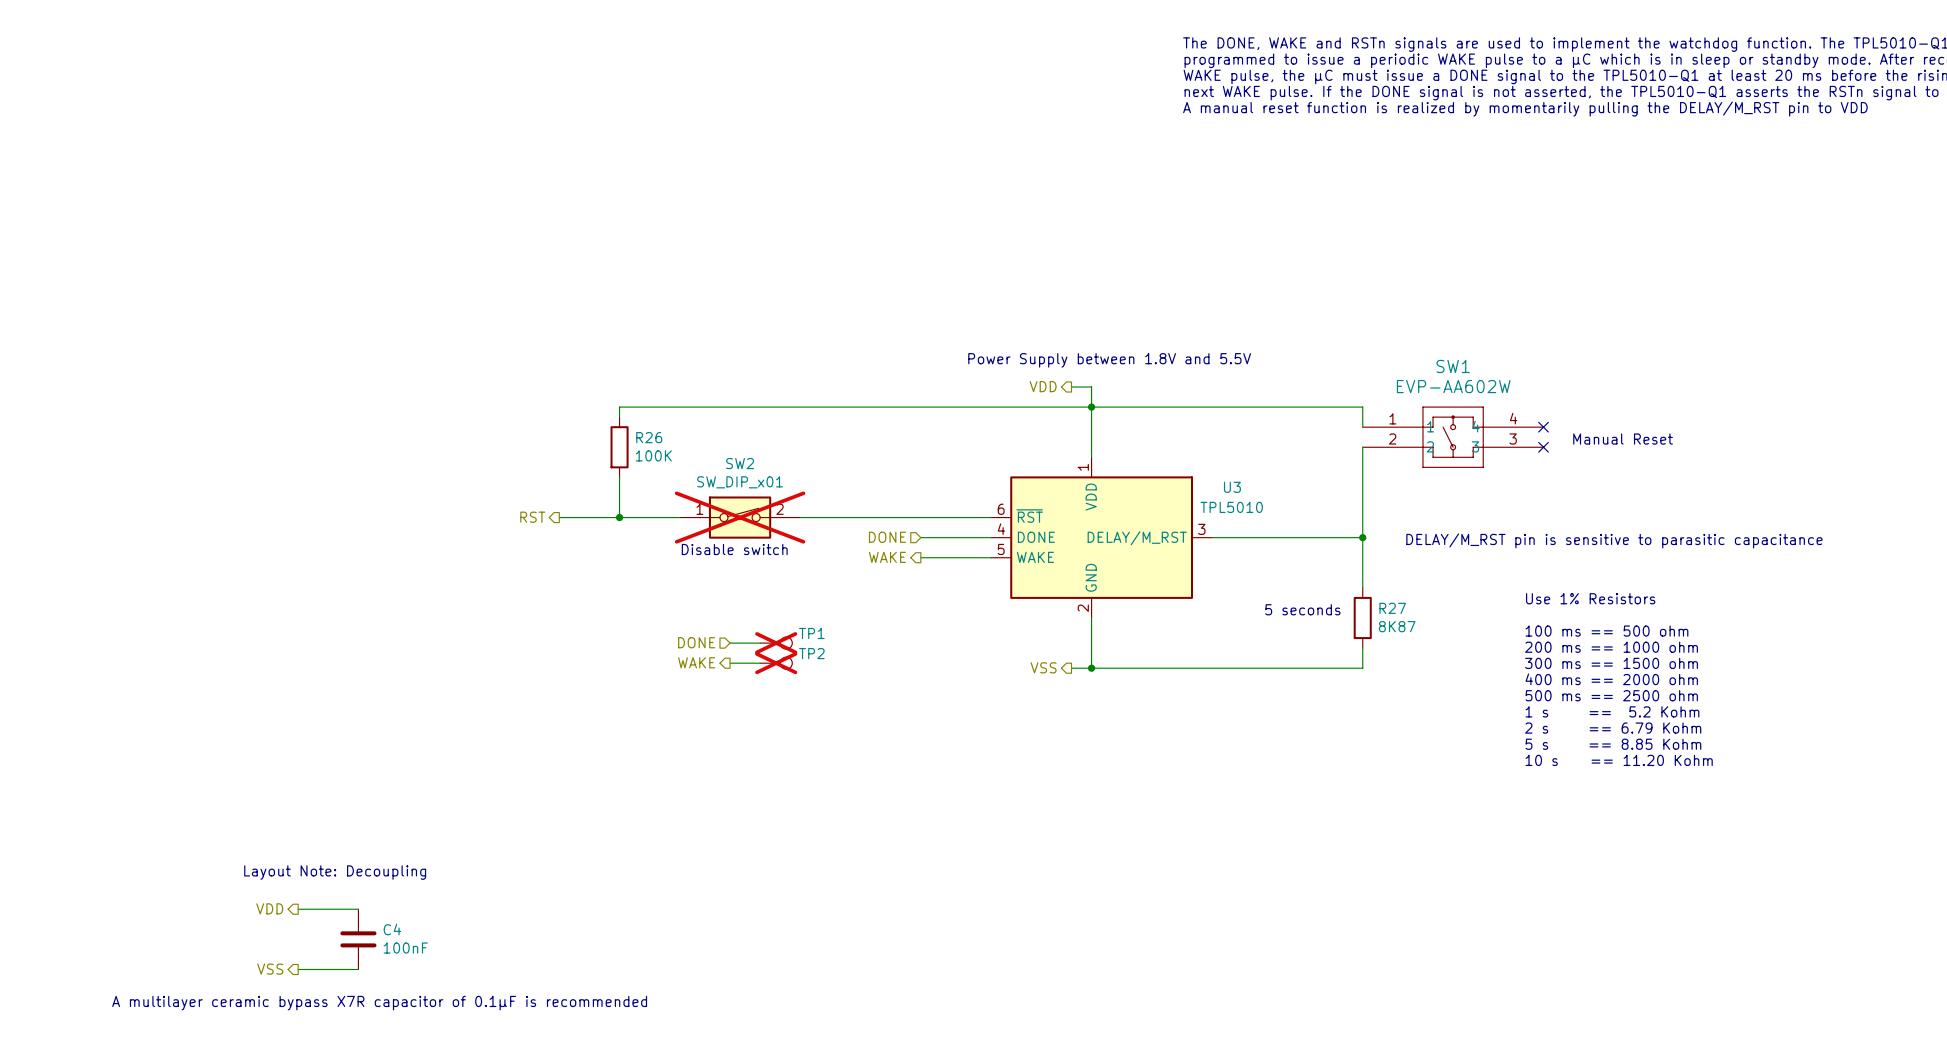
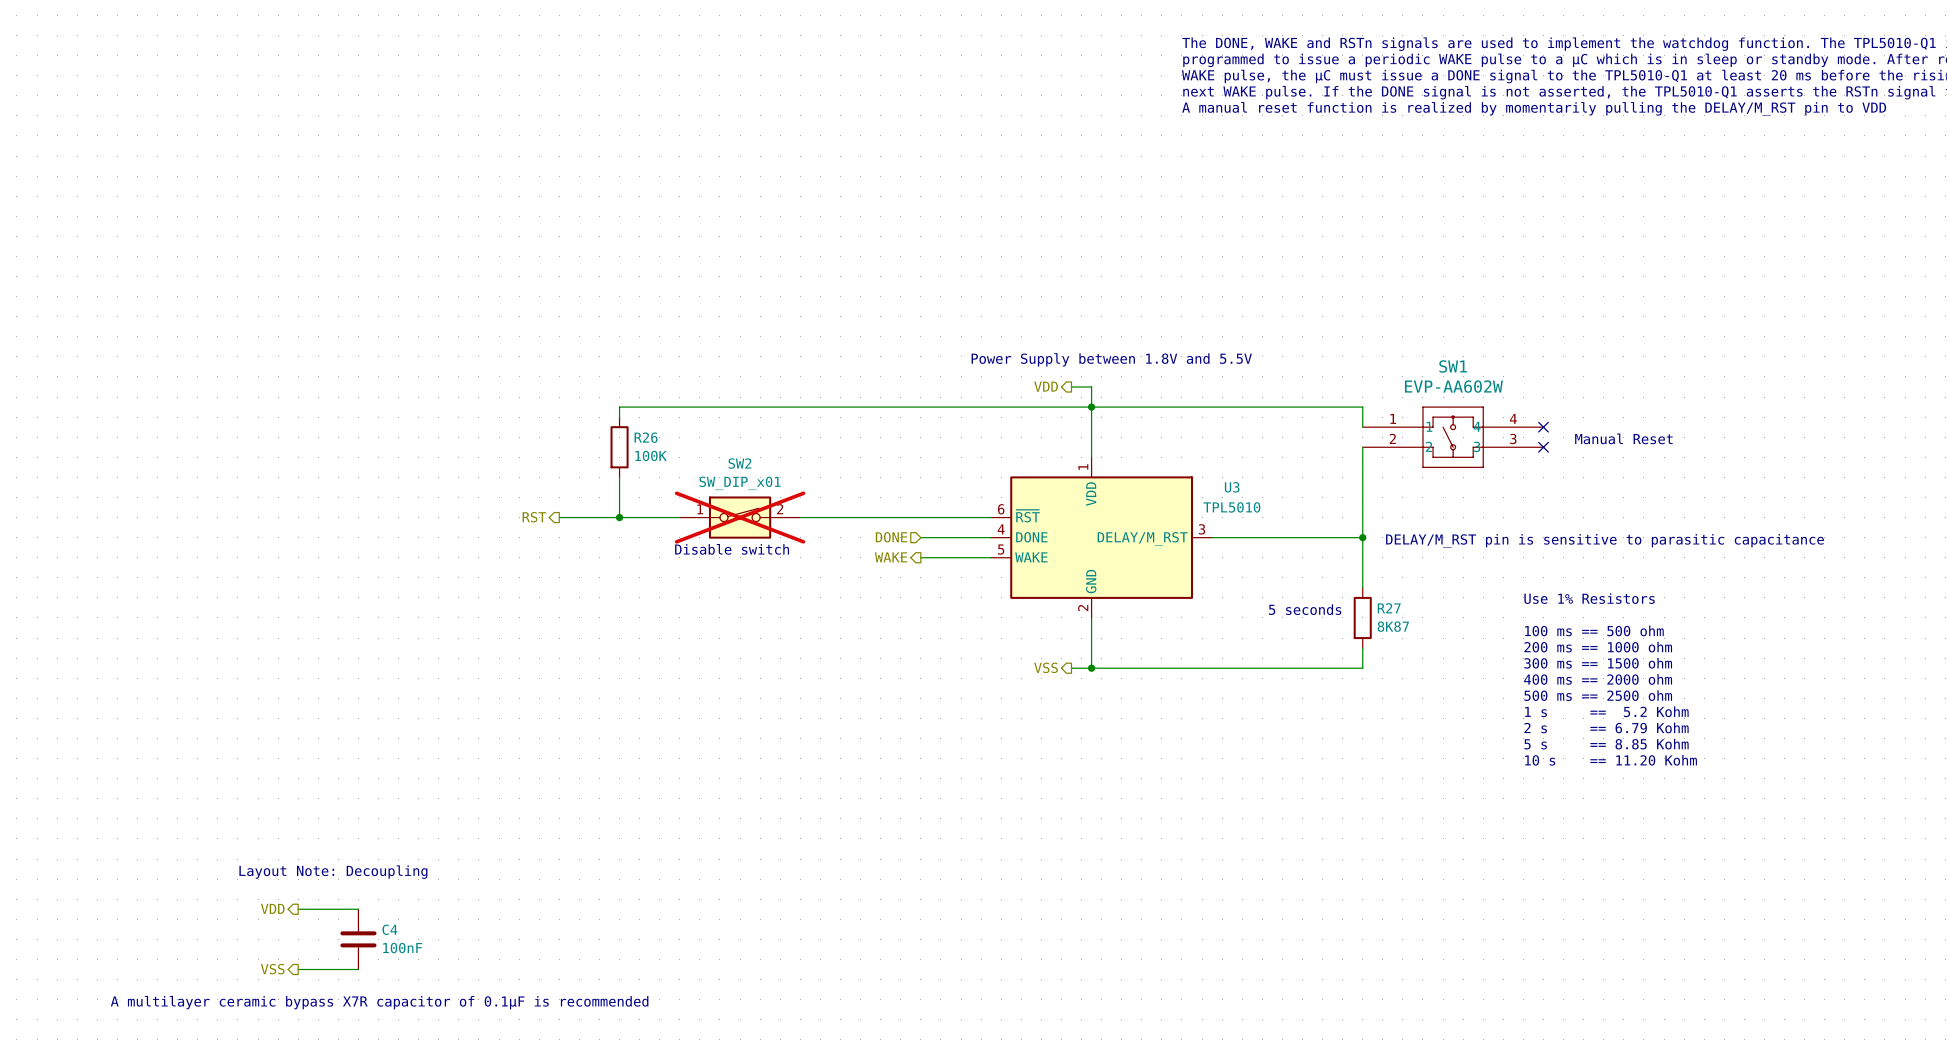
hierarchical label: DONE (696, 642) -> none
wire: (730, 643) (760, 643) -> none
TP1: (776, 643) -> none
hierarchical label: WAKE (696, 662) -> none
wire: (730, 663) (760, 663) -> none
TP2: (776, 663) -> none

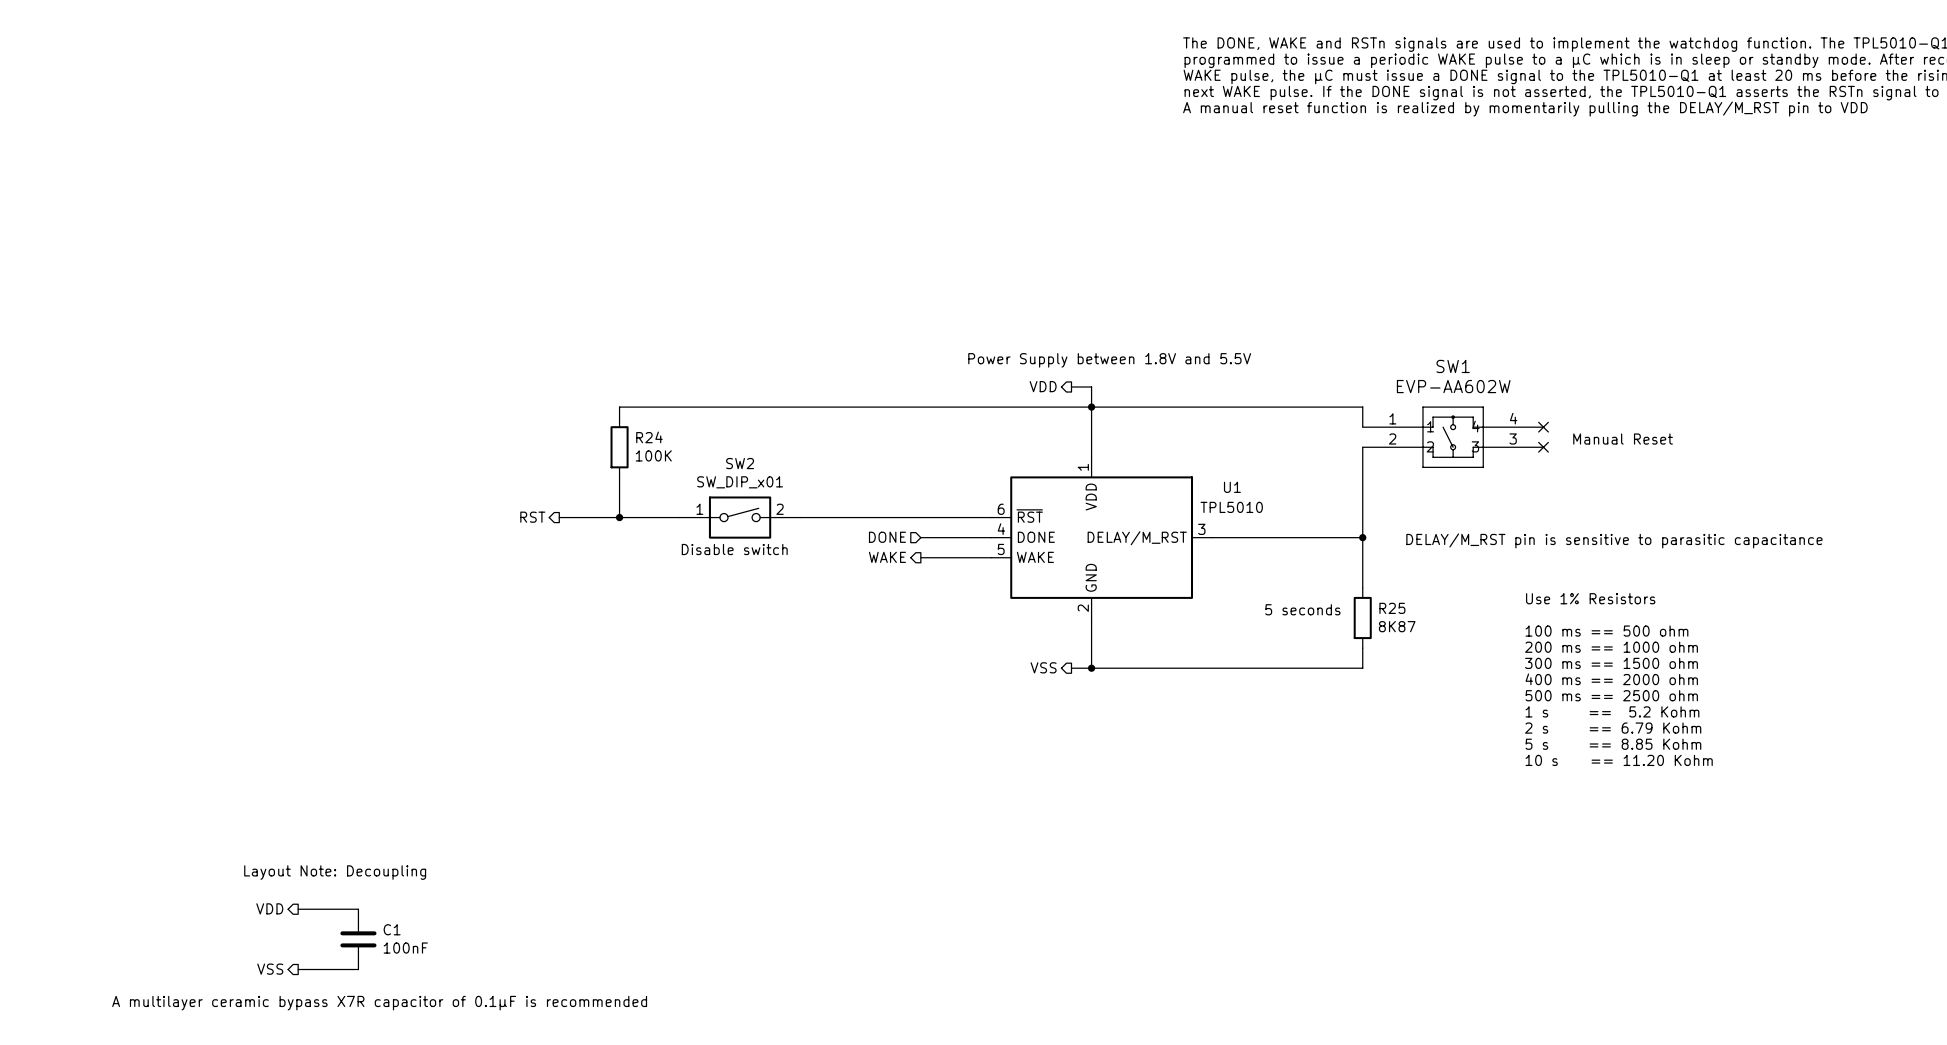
R26 name: R26 (646, 437) -> R24 (649, 437)
U3 name: U3 (1232, 487) -> U1 (1232, 487)
SW2 do-not-place cross: (740, 517) -> none
R27 name: R27 (1389, 608) -> R25 (1392, 608)
C4 name: C4 (389, 929) -> C1 (392, 929)

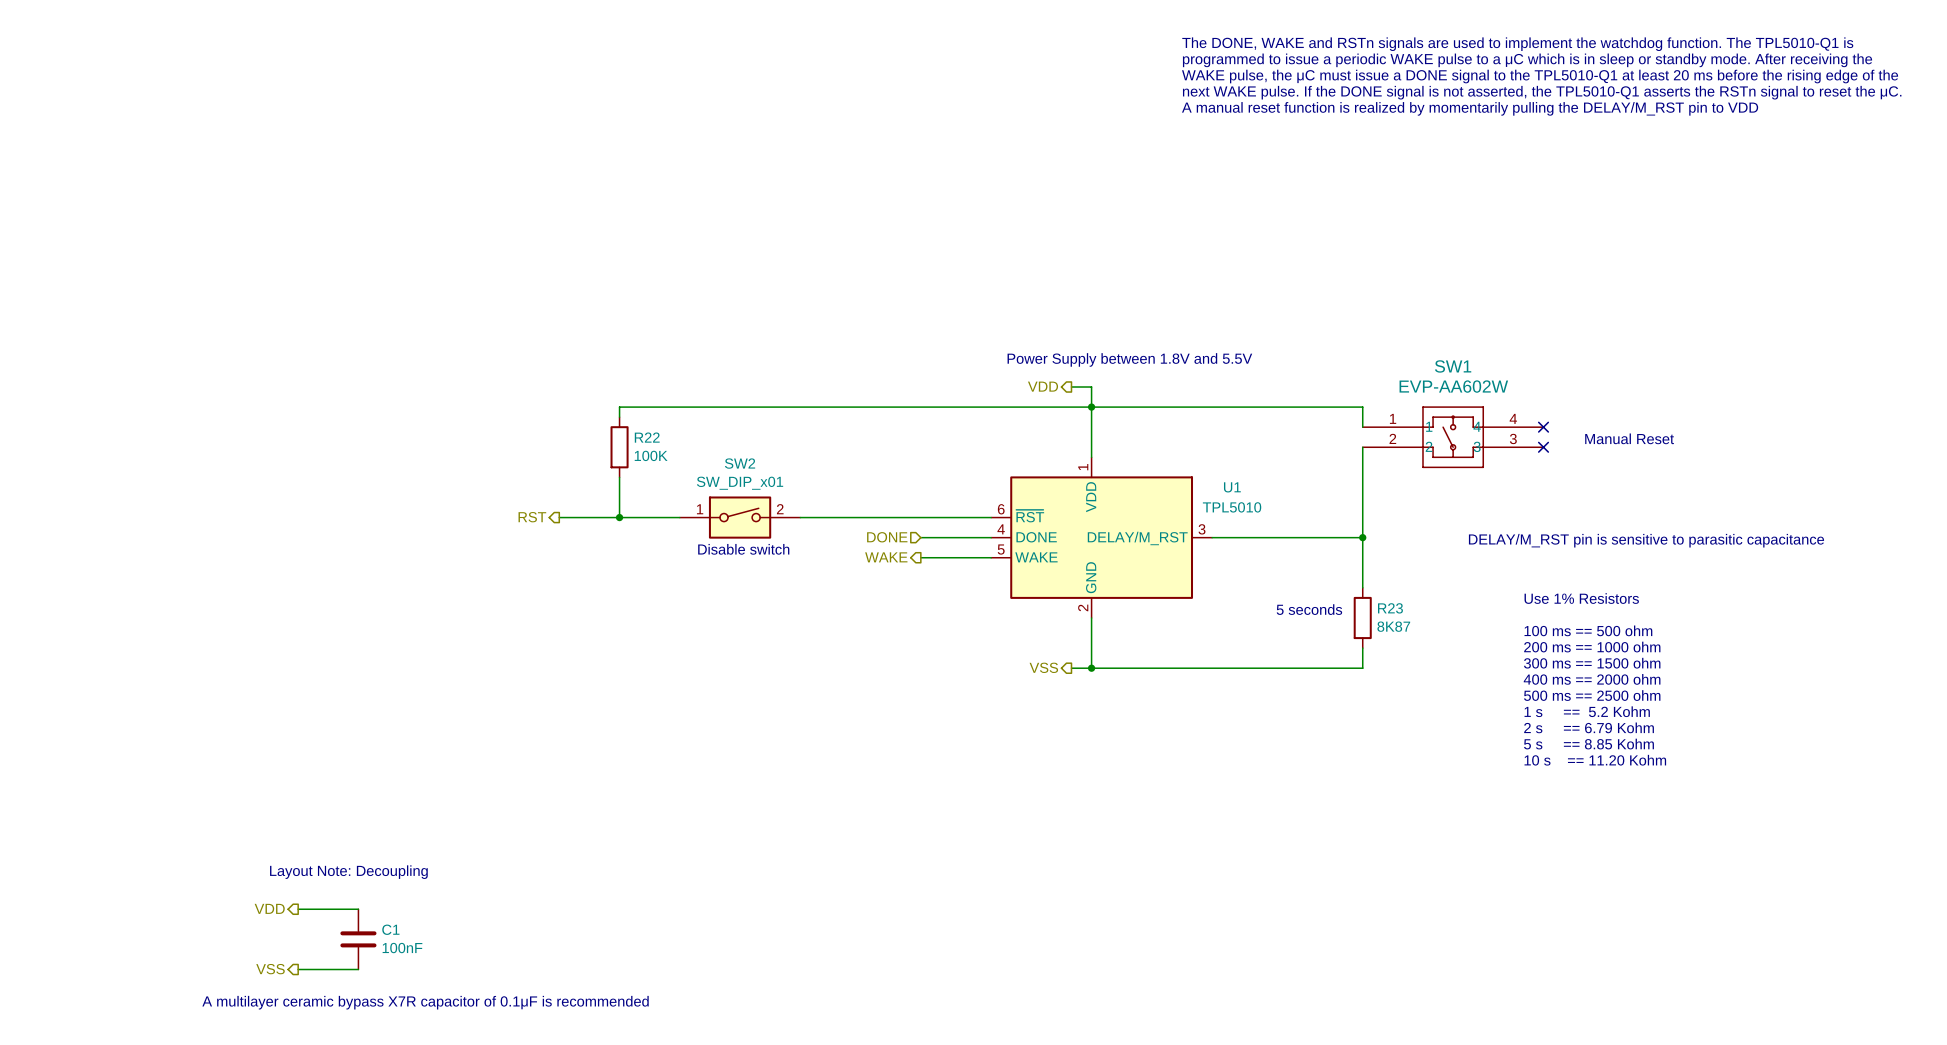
R24 name: R24 (649, 437) -> R22 (647, 437)
R25 name: R25 (1392, 608) -> R23 (1390, 608)

